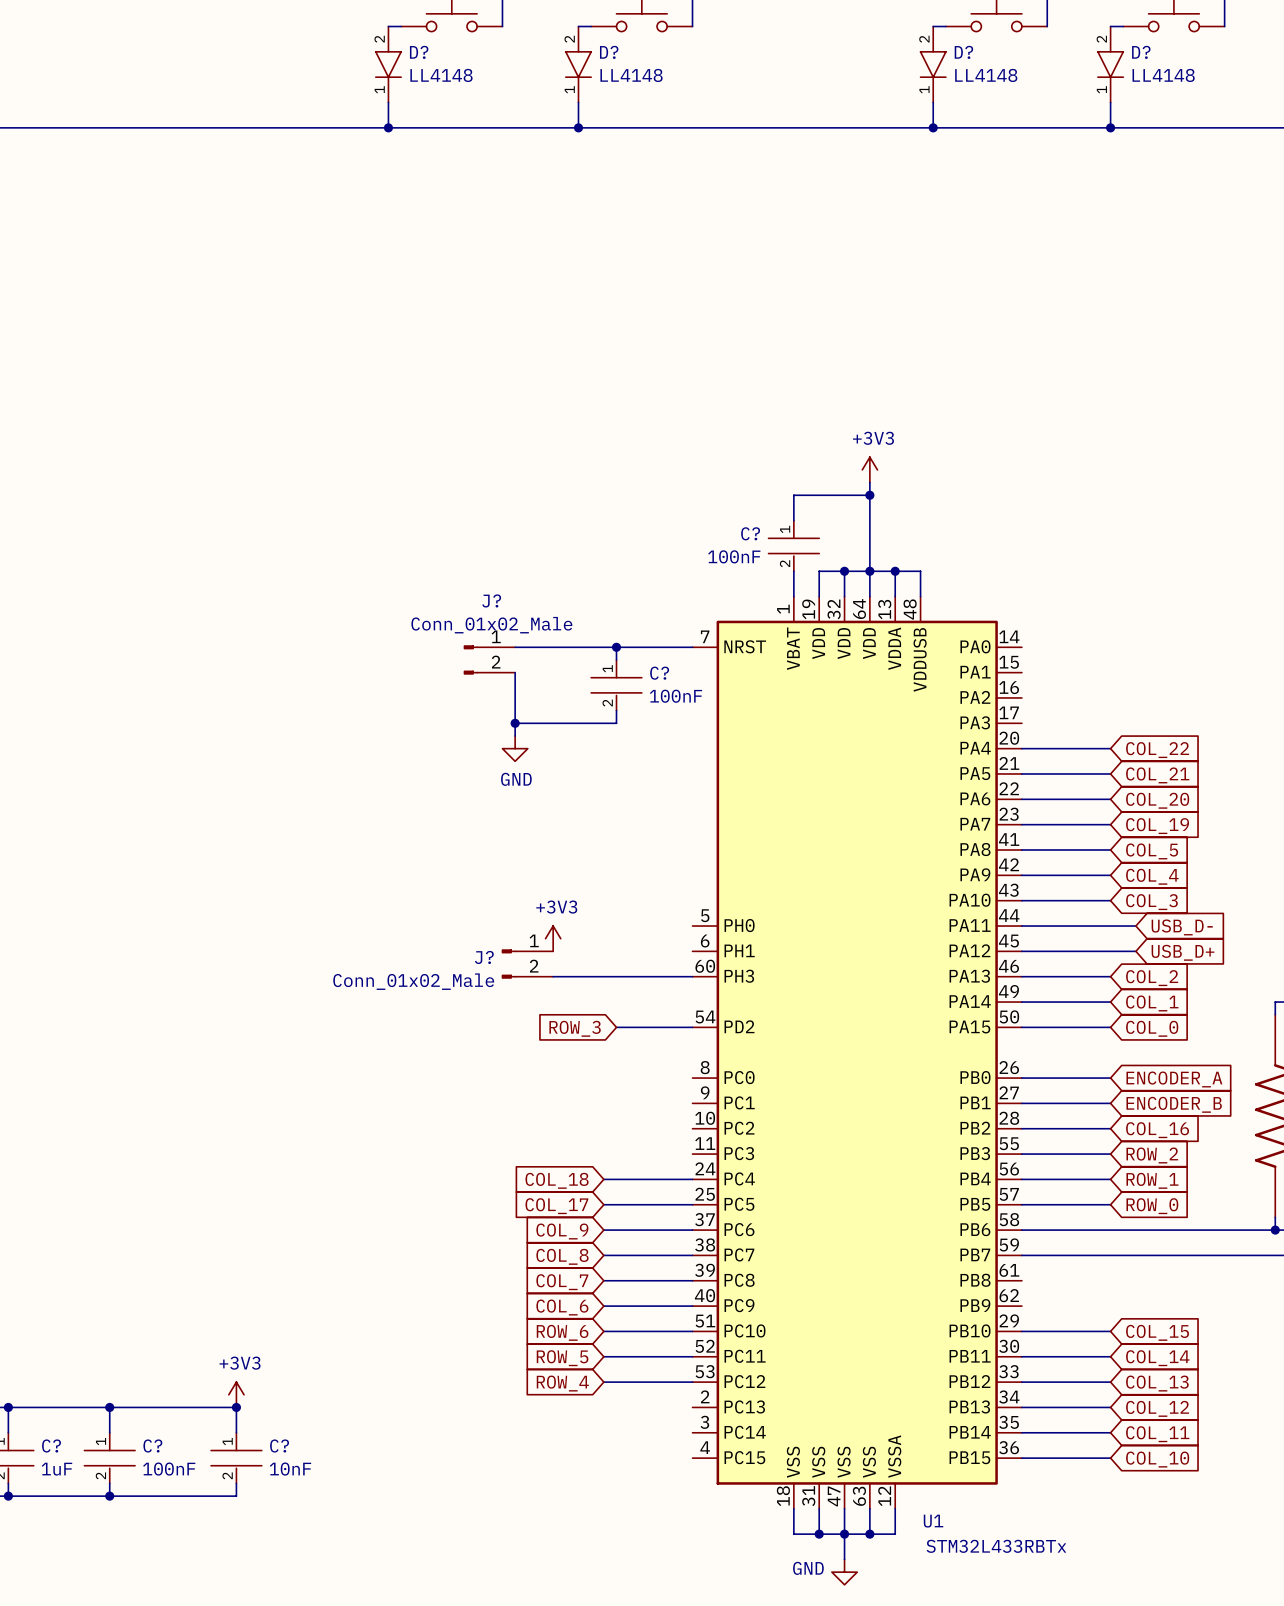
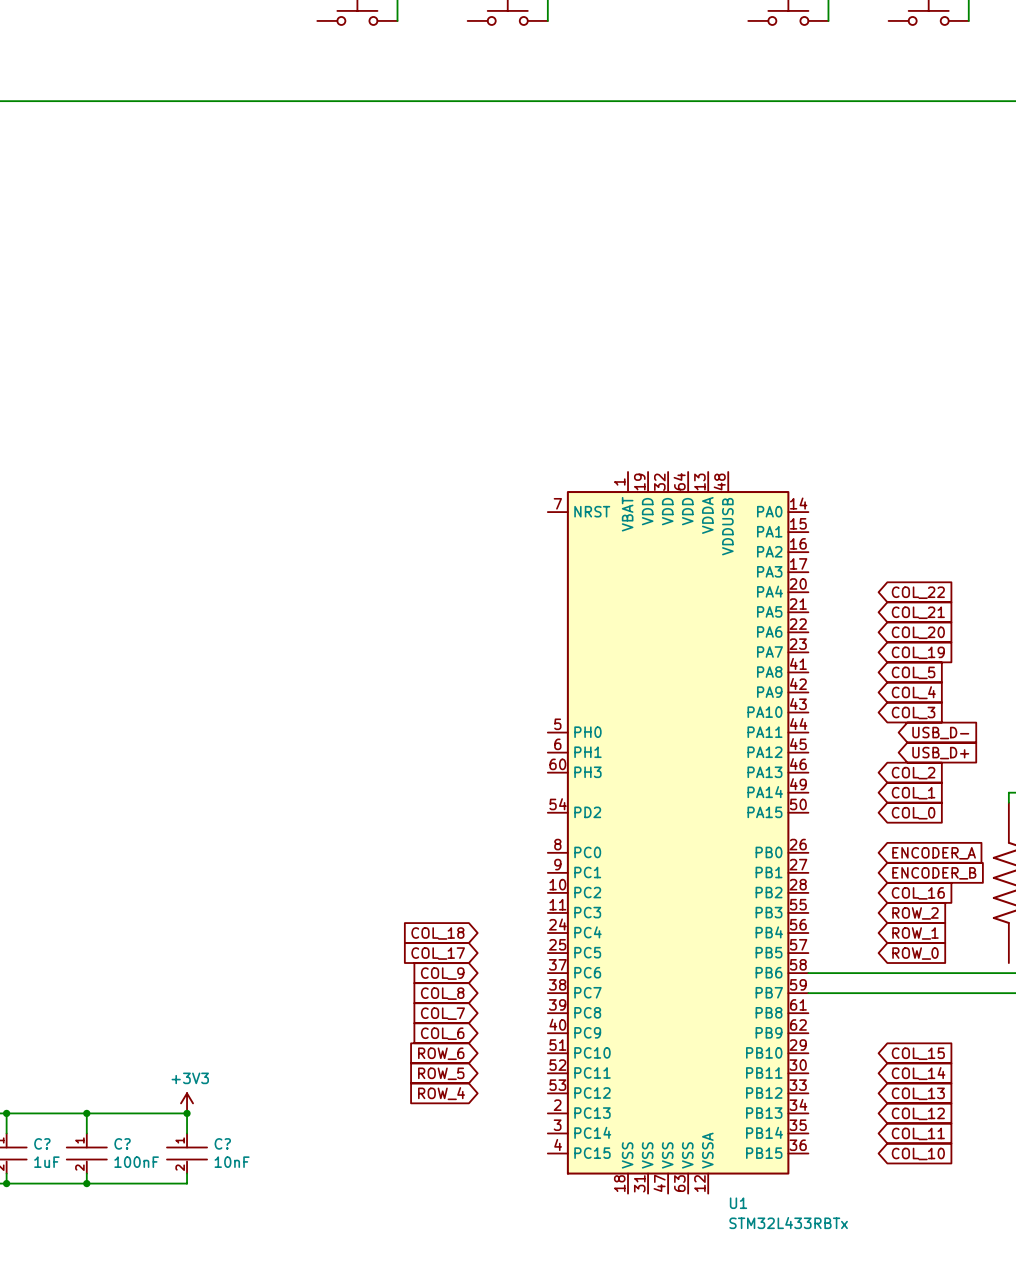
wire: (388, 26) (401, 26) -> none
wire: (578, 26) (591, 26) -> none
wire: (933, 26) (945, 26) -> none
wire: (1110, 26) (1123, 26) -> none
D?: LL4148 (388, 64) -> none
D?: LL4148 (578, 64) -> none
D?: LL4148 (933, 64) -> none
D?: LL4148 (1110, 64) -> none
wire: (388, 102) (388, 127) -> none
wire: (578, 102) (578, 127) -> none
wire: (933, 102) (933, 127) -> none
wire: (1110, 102) (1110, 127) -> none
junction: (388, 127) -> none
junction: (578, 127) -> none
junction: (933, 127) -> none
junction: (1110, 127) -> none
power symbol: +3V3 (869, 469) -> none
wire: (869, 482) (869, 596) -> none
wire: (869, 495) (793, 495) (793, 520) -> none
junction: (869, 495) -> none
C?: (793, 545) -> none
wire: (793, 571) (793, 596) -> none
wire: (844, 571) (844, 596) -> none
junction: (844, 571) -> none
junction: (869, 571) -> none
wire: (895, 571) (895, 596) -> none
junction: (895, 571) -> none
wire: (819, 596) (819, 571) (920, 571) (920, 596) -> none
wire: (515, 647) (692, 647) -> none
wire: (616, 647) (616, 659) -> none
junction: (616, 647) -> none
J?: Conn_01x02_Male (489, 659) -> none
wire: (515, 672) (515, 735) -> none
C?: (616, 685) -> none
wire: (616, 710) (616, 723) (515, 723) -> none
junction: (515, 723) -> none
power symbol: GND (515, 748) -> none
wire: (1021, 748) (1110, 748) -> none
wire: (1021, 773) (1110, 773) -> none
wire: (1021, 799) (1110, 799) -> none
wire: (1021, 824) (1110, 824) -> none
wire: (1021, 850) (1110, 850) -> none
wire: (1021, 875) (1110, 875) -> none
wire: (1021, 900) (1110, 900) -> none
wire: (1021, 926) (1135, 926) -> none
power symbol: +3V3 (553, 938) -> none
wire: (1021, 951) (1135, 951) -> none
J?: Conn_01x02_Male (527, 964) -> none
wire: (553, 976) (692, 976) -> none
wire: (1021, 976) (1110, 976) -> none
wire: (1021, 1002) (1110, 1002) -> none
wire: (616, 1027) (692, 1027) -> none
wire: (1021, 1027) (1110, 1027) -> none
global label: ROW_3 (575, 1028) -> none
wire: (1021, 1078) (1110, 1078) -> none
wire: (1021, 1103) (1110, 1103) -> none
wire: (1021, 1128) (1110, 1128) -> none
wire: (1021, 1154) (1110, 1154) -> none
wire: (603, 1179) (692, 1179) -> none
wire: (1021, 1179) (1110, 1179) -> none
wire: (603, 1204) (692, 1204) -> none
wire: (1021, 1204) (1110, 1204) -> none
wire: (1275, 1217) (1275, 1230) -> none
wire: (603, 1230) (692, 1230) -> none
junction: (1275, 1230) -> none
wire: (603, 1255) (692, 1255) -> none
wire: (603, 1280) (692, 1280) -> none
wire: (603, 1306) (692, 1306) -> none
wire: (603, 1331) (692, 1331) -> none
wire: (1021, 1331) (1110, 1331) -> none
wire: (603, 1356) (692, 1356) -> none
wire: (1021, 1356) (1110, 1356) -> none
wire: (603, 1382) (692, 1382) -> none
wire: (1021, 1382) (1110, 1382) -> none
wire: (1021, 1407) (1110, 1407) -> none
wire: (1021, 1432) (1110, 1432) -> none
wire: (1021, 1458) (1110, 1458) -> none
wire: (793, 1508) (793, 1534) (895, 1534) (895, 1508) -> none
wire: (819, 1508) (819, 1534) -> none
wire: (844, 1508) (844, 1559) -> none
wire: (869, 1508) (869, 1534) -> none
junction: (819, 1534) -> none
junction: (844, 1534) -> none
junction: (869, 1534) -> none
power symbol: GND (844, 1572) -> none

